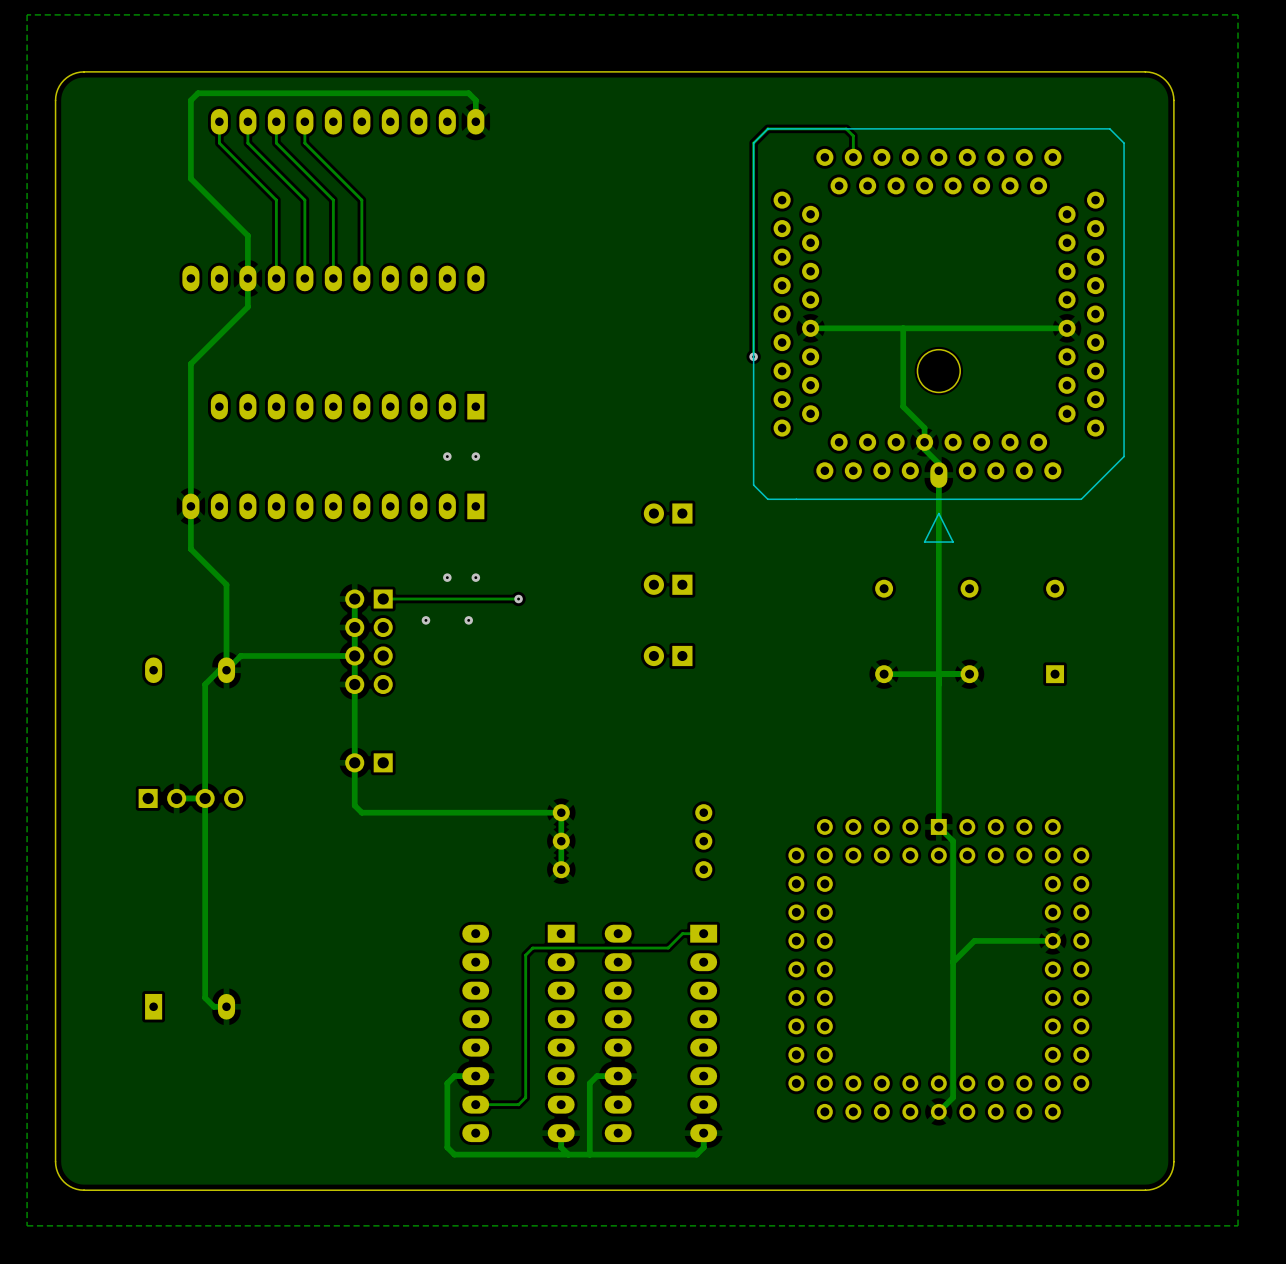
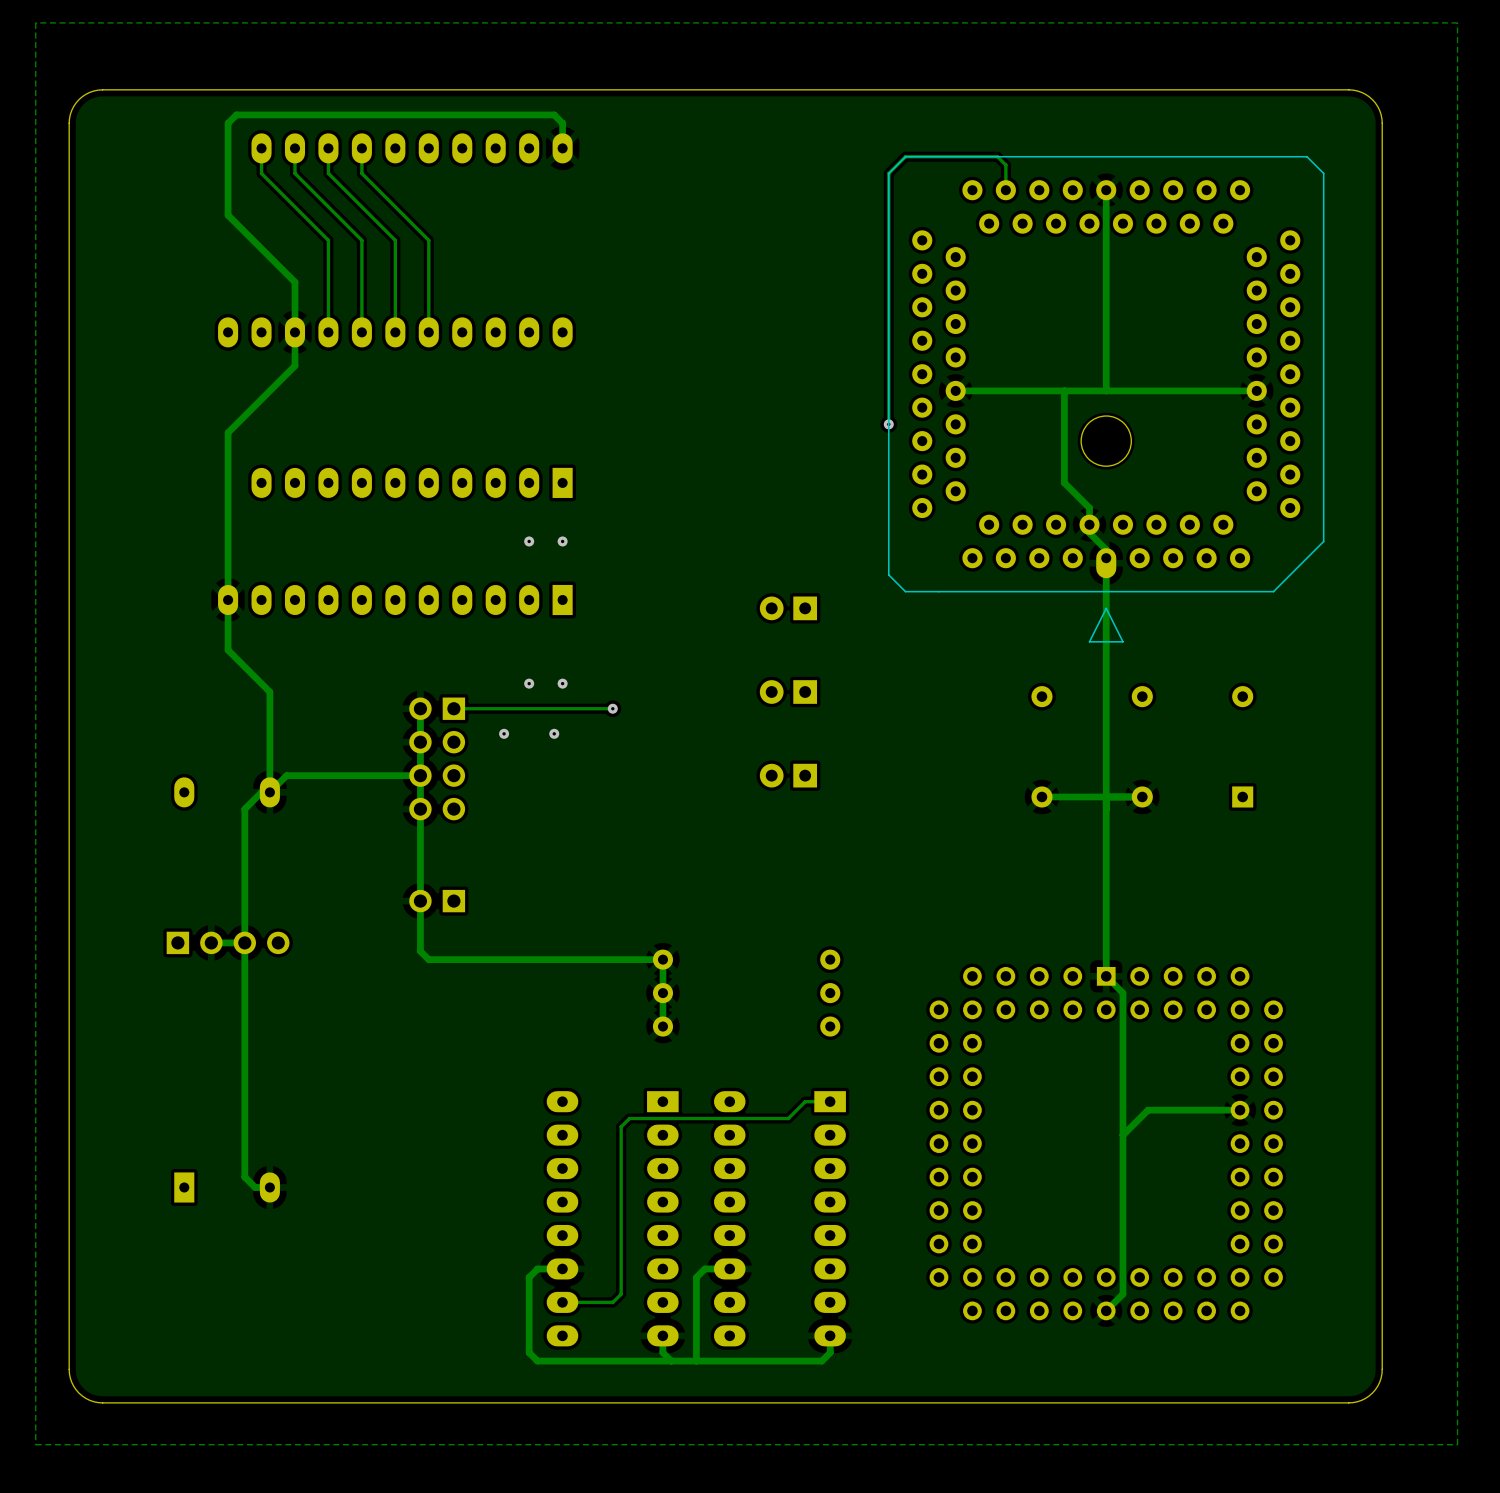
track: none -> (1106, 190) (1106, 390)

